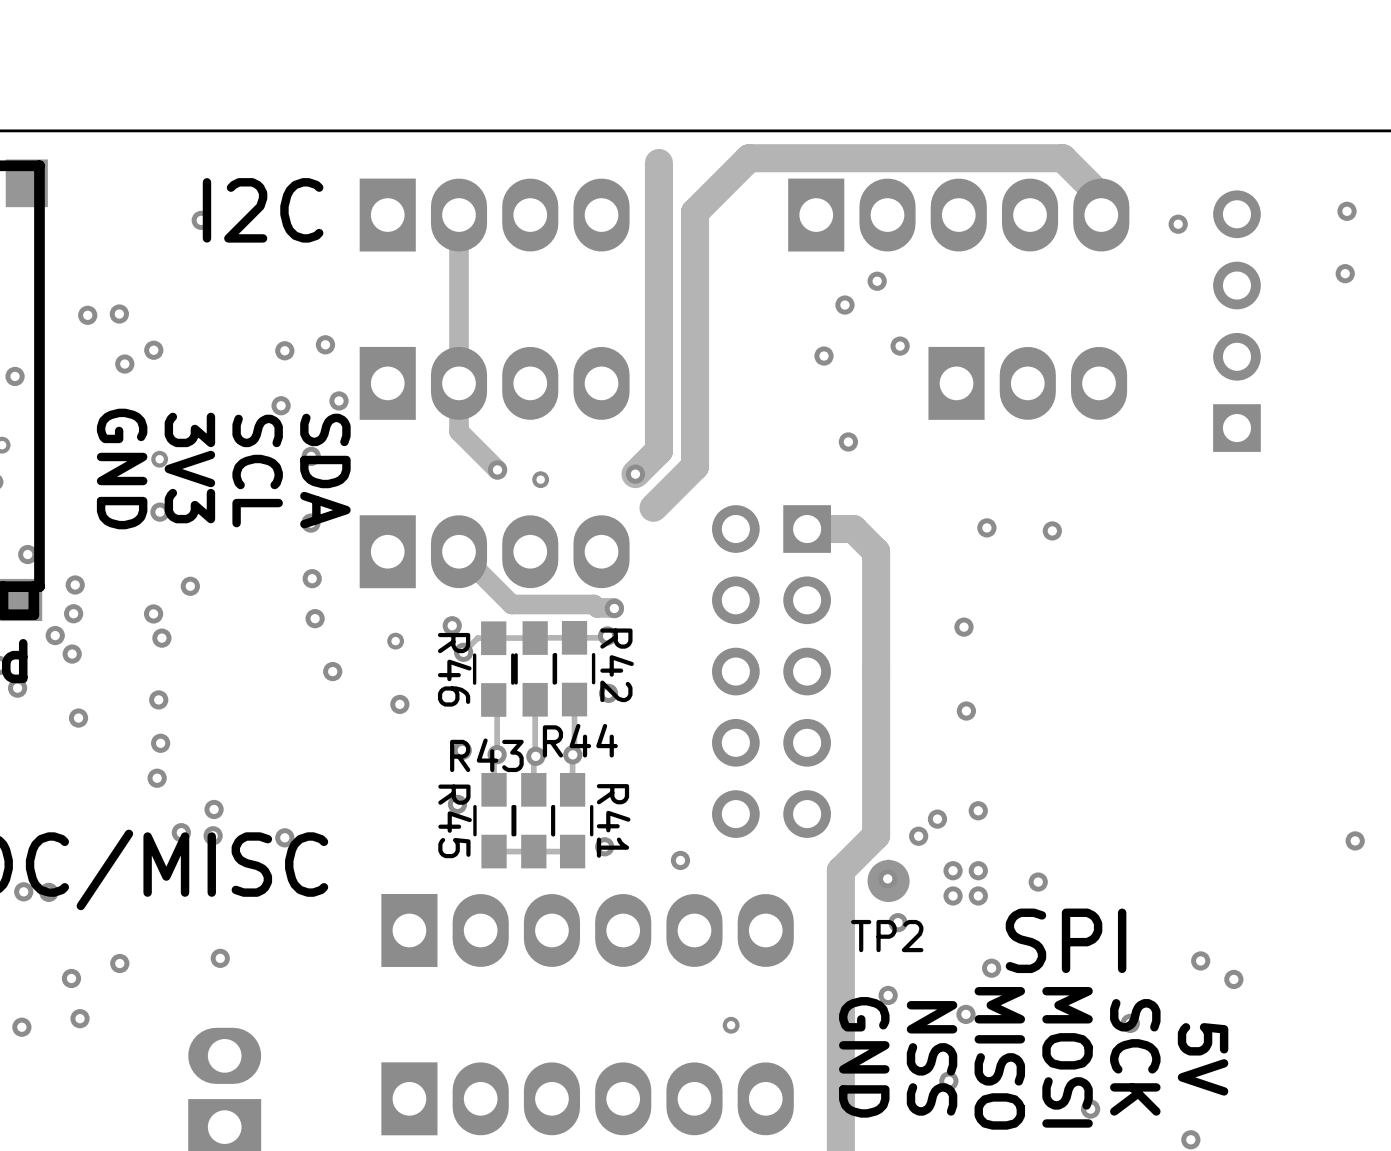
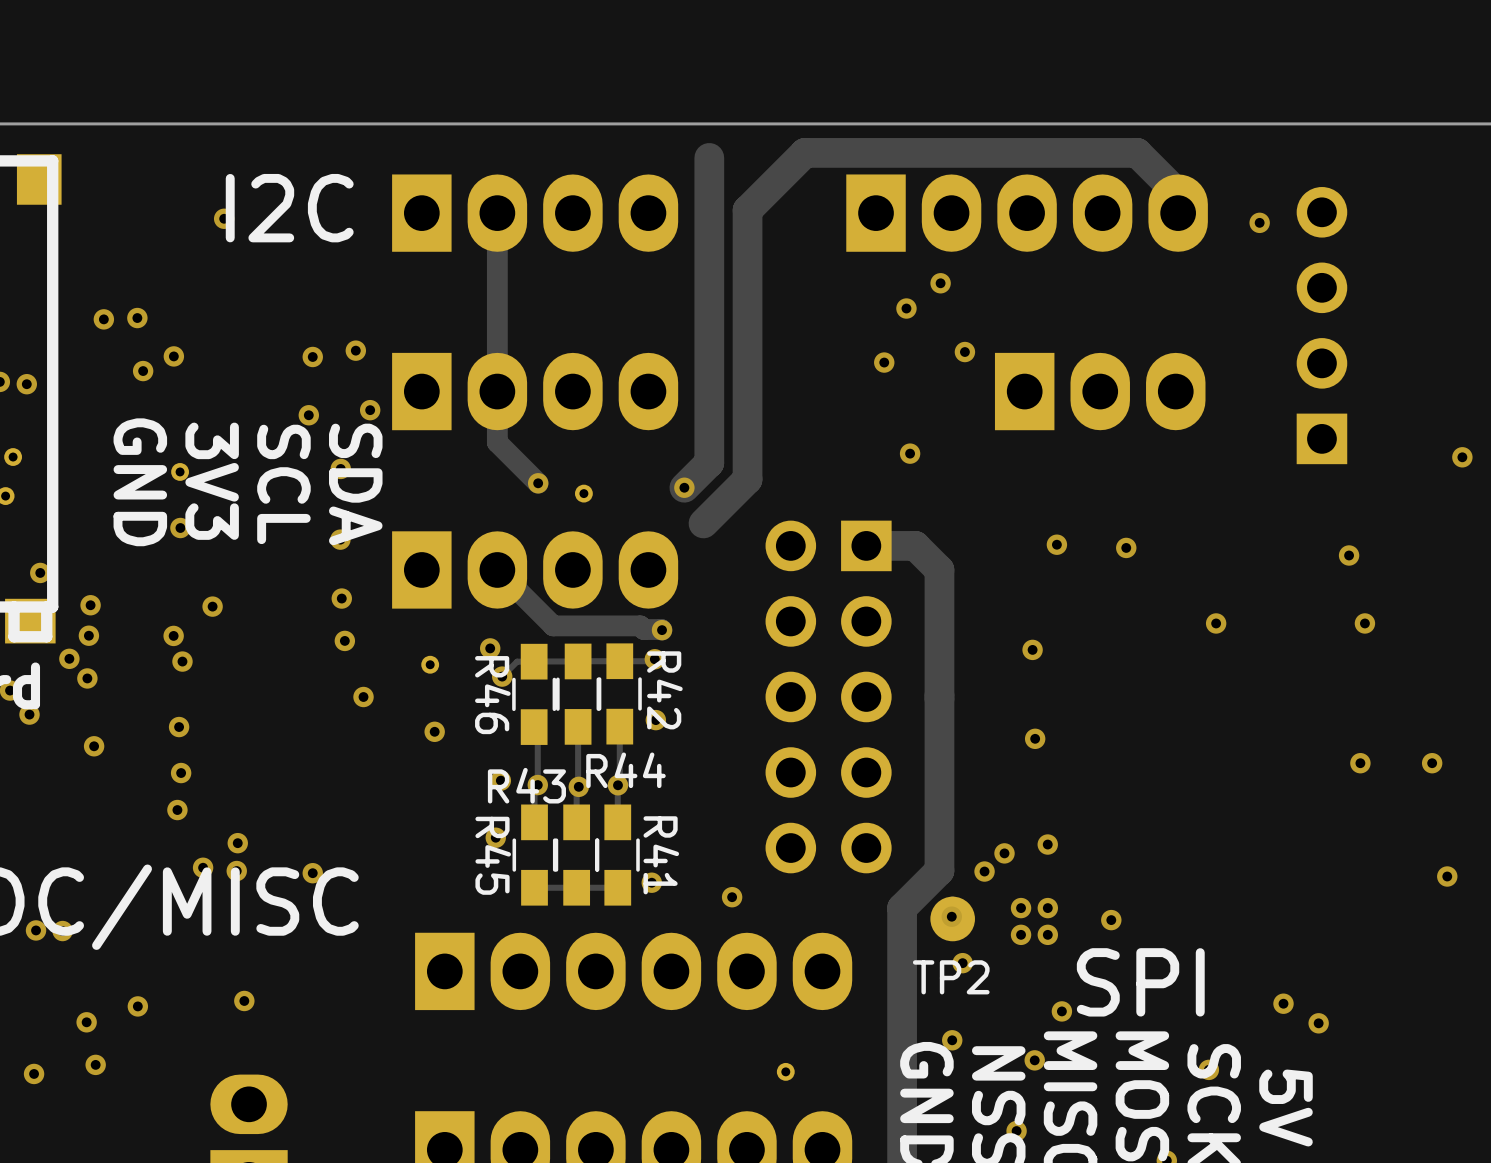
via: (1347, 211) -> none
via: (1345, 273) -> none
via: none -> (1462, 457)
via: none -> (1349, 555)
via: none -> (1216, 623)
via: none -> (1364, 623)
via: none -> (1360, 763)
via: none -> (1432, 763)

